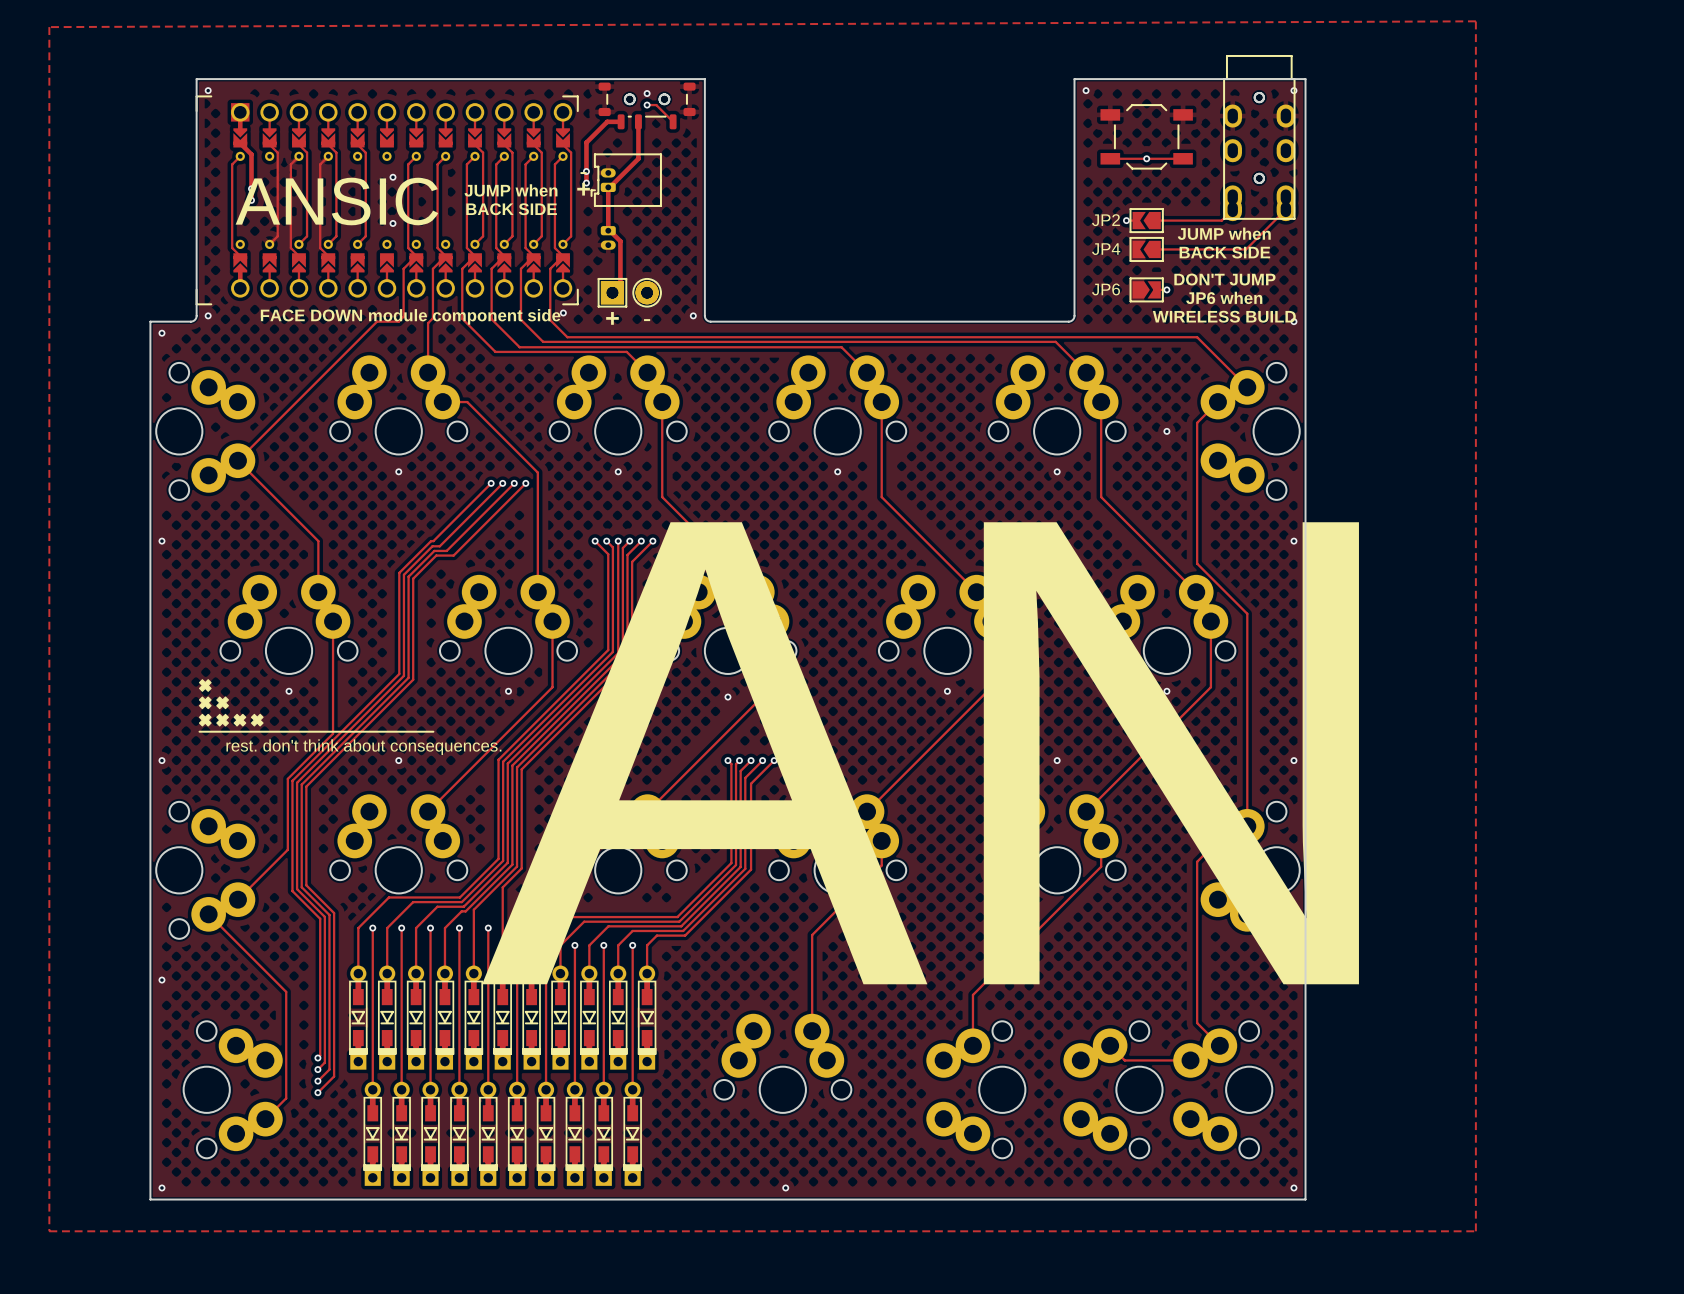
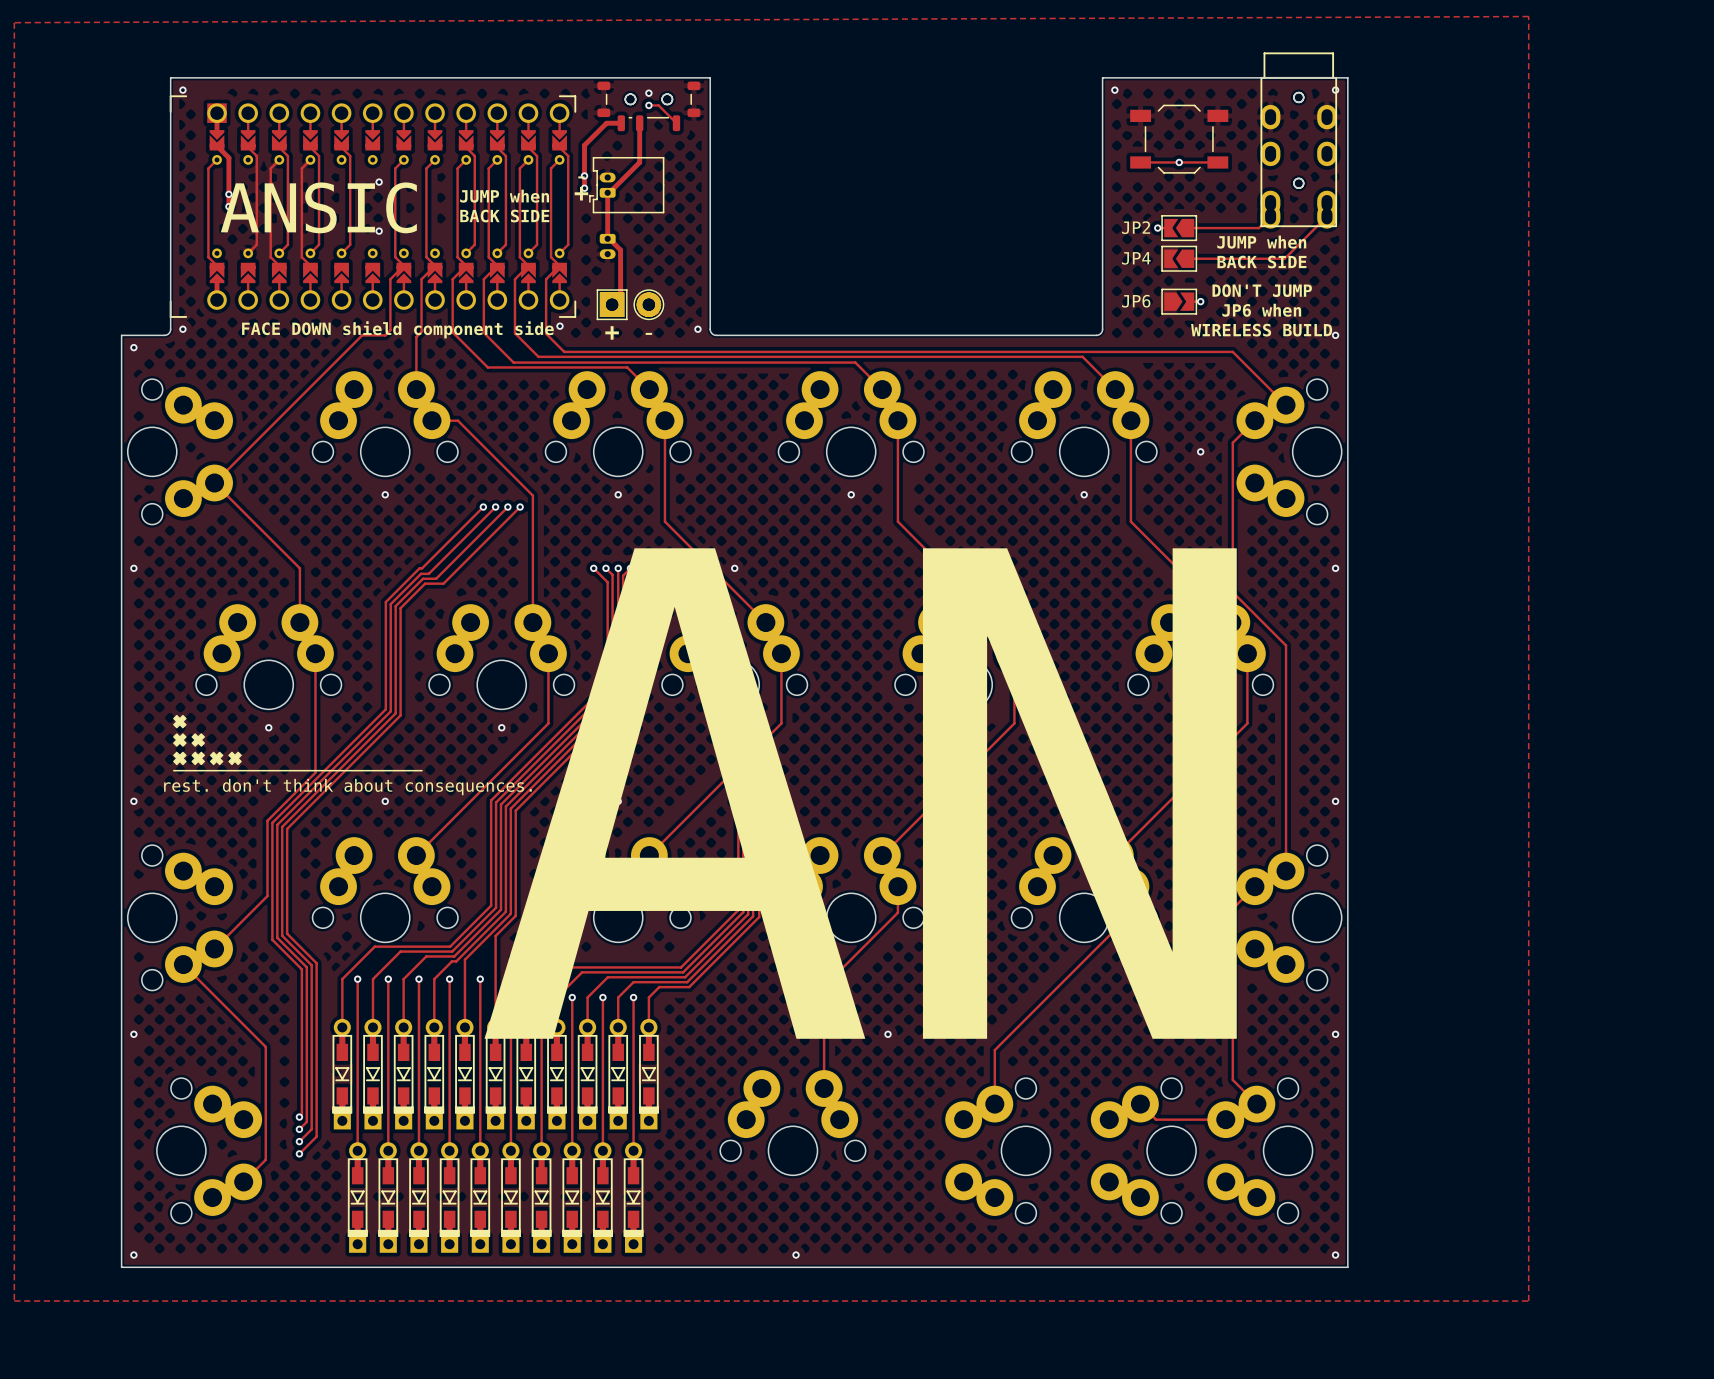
text: FACE DOWN module component side (410, 316) -> FACE DOWN shield component side (397, 329)

